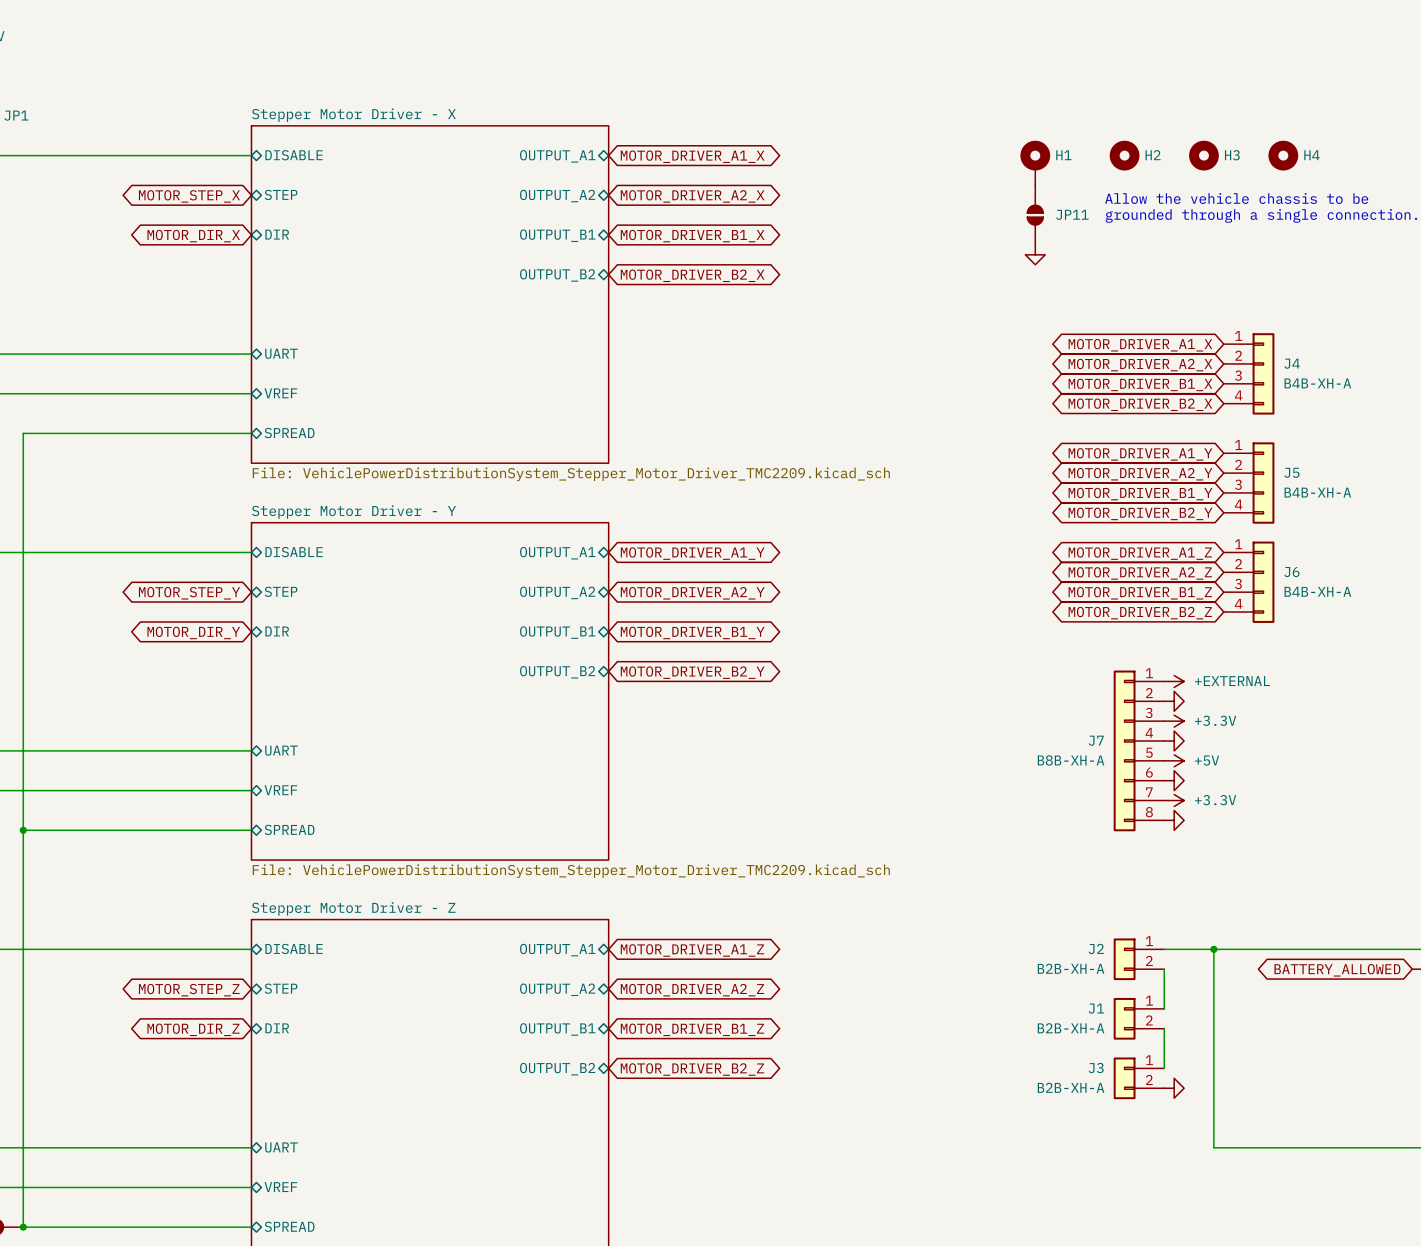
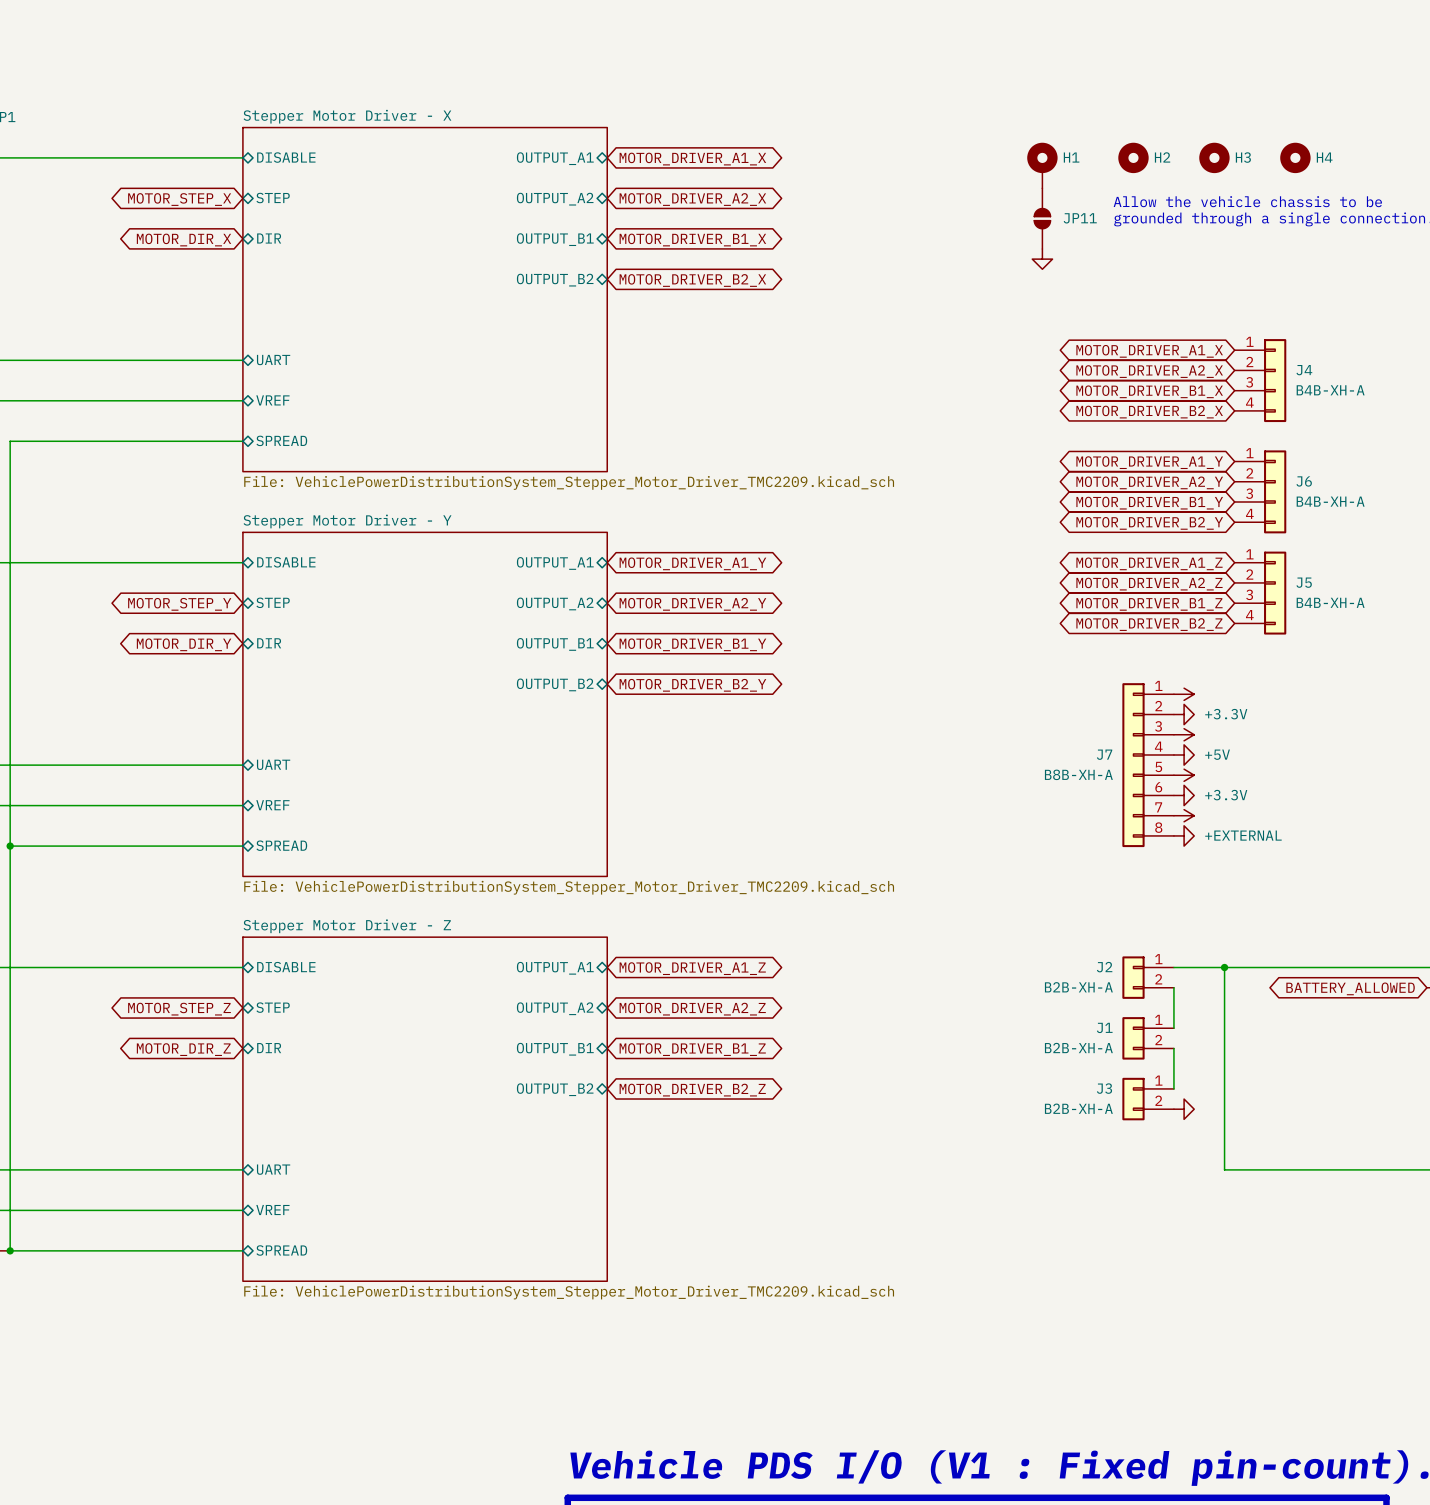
J5 name: J5 (1291, 472) -> J6 (1304, 481)
J6 name: J6 (1291, 572) -> J5 (1304, 582)
power symbol text: +EXTERNAL (1232, 681) -> none
power symbol text: none -> +3.3V (1226, 714)
power symbol text: +3.3V (1215, 720) -> none
power symbol text: none -> +5V (1217, 754)
power symbol text: +5V (1207, 760) -> none
power symbol text: none -> +3.3V (1226, 795)
power symbol text: +3.3V (1215, 800) -> none
power symbol text: none -> +EXTERNAL (1243, 835)

